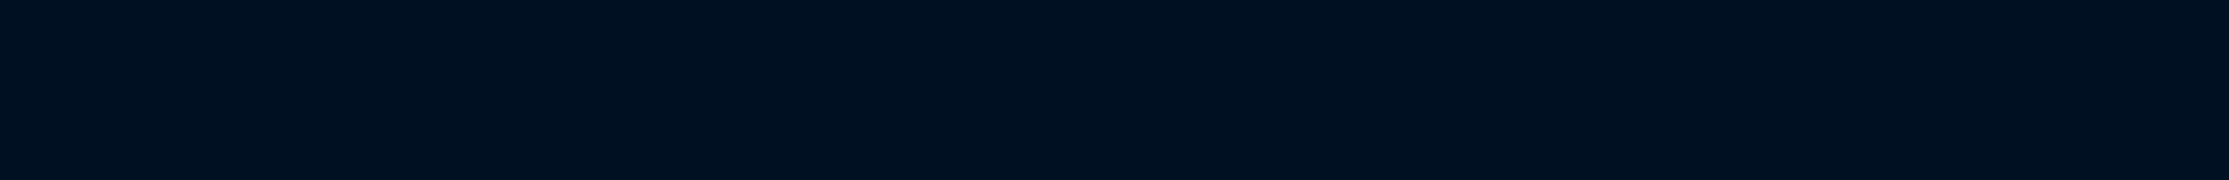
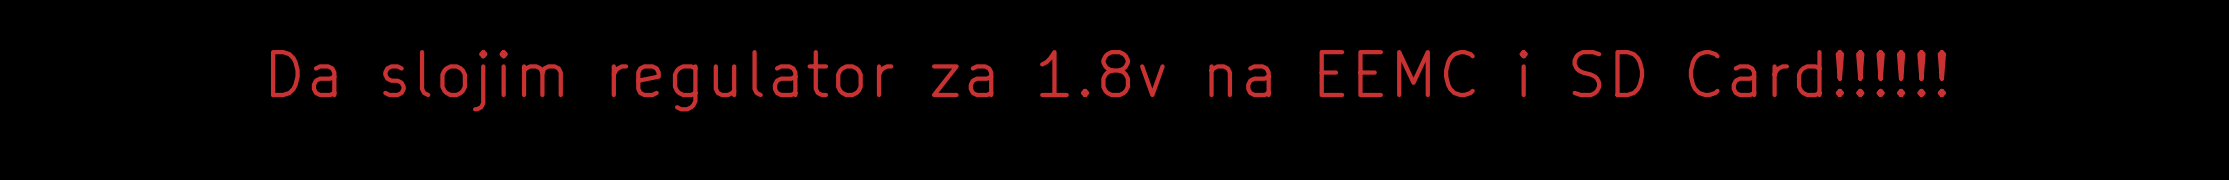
text: none -> Da slojim regulator za 1.8v na EEMC i SD Card!!!!!! (1108, 80)

